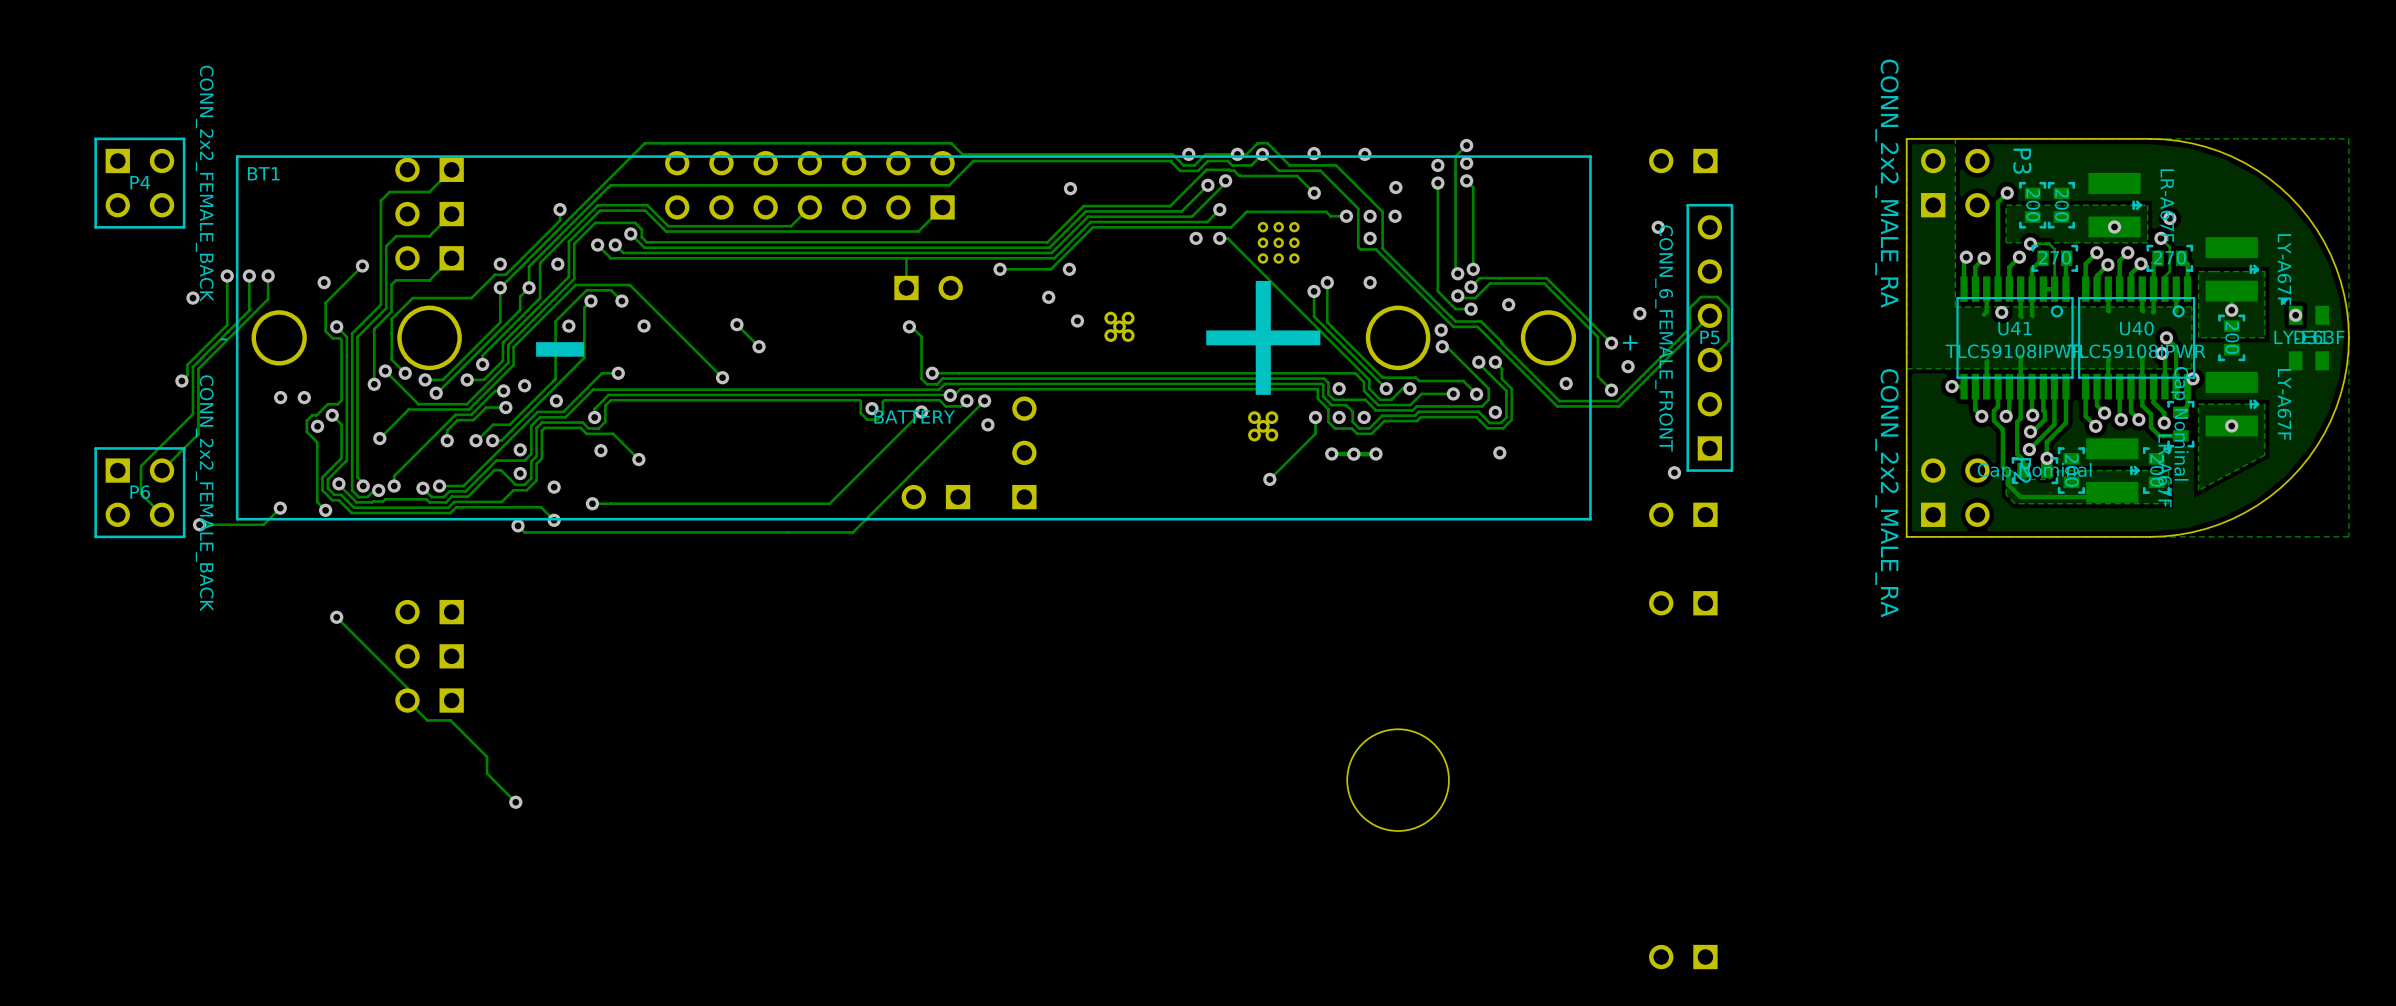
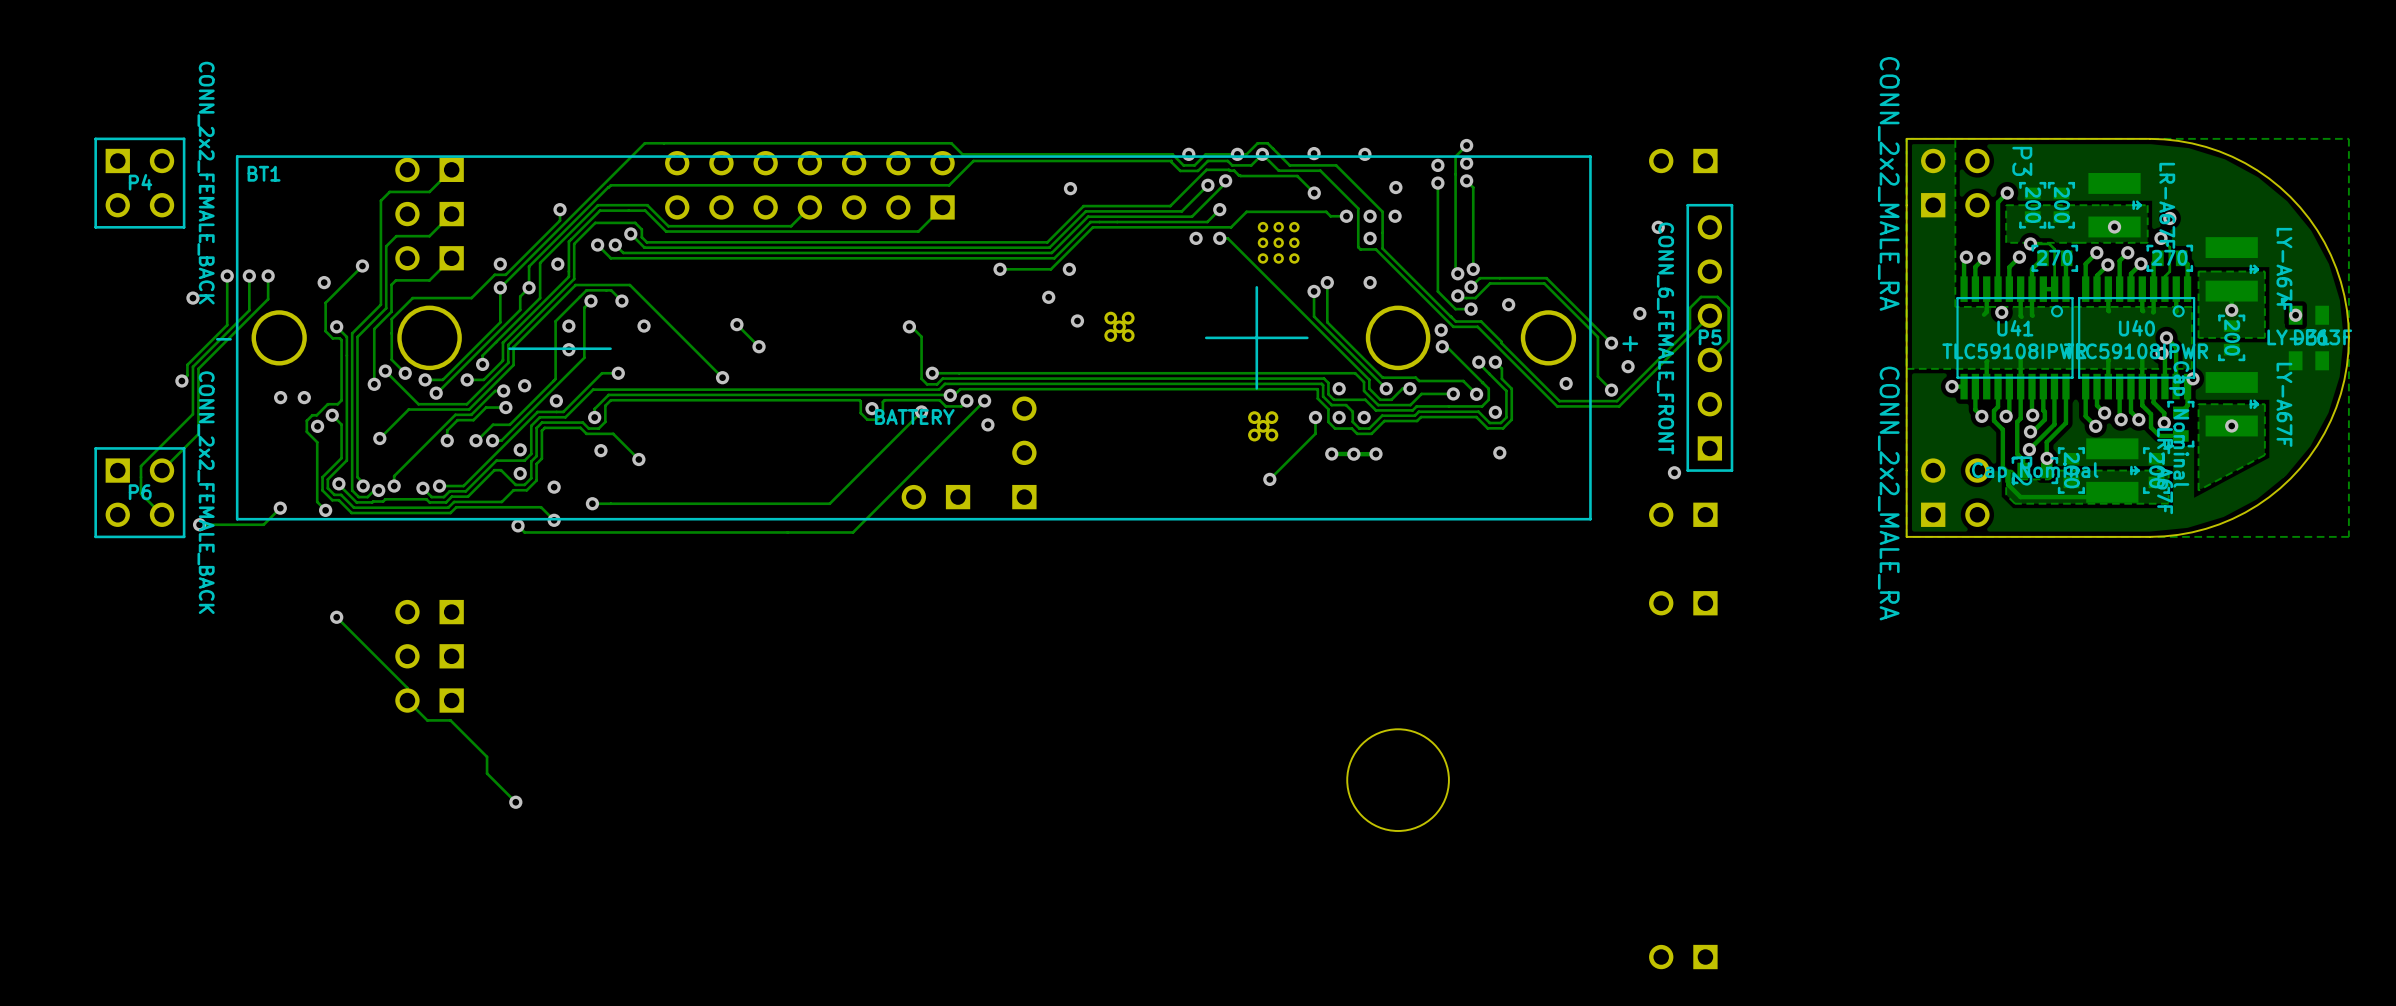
track: (906, 258) (906, 287) -> none
part: (928, 287) -> none

